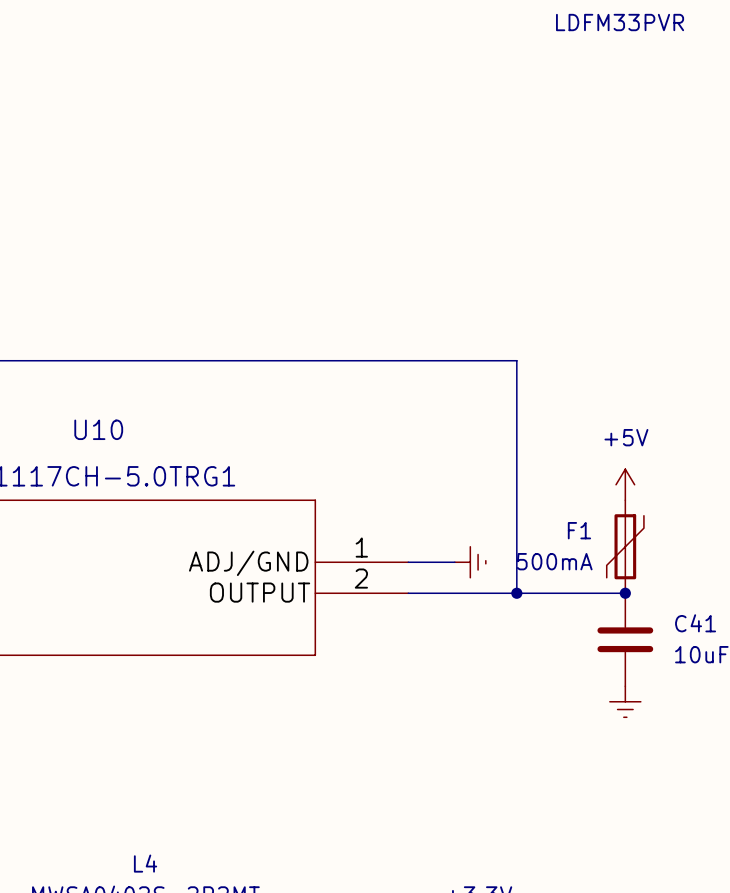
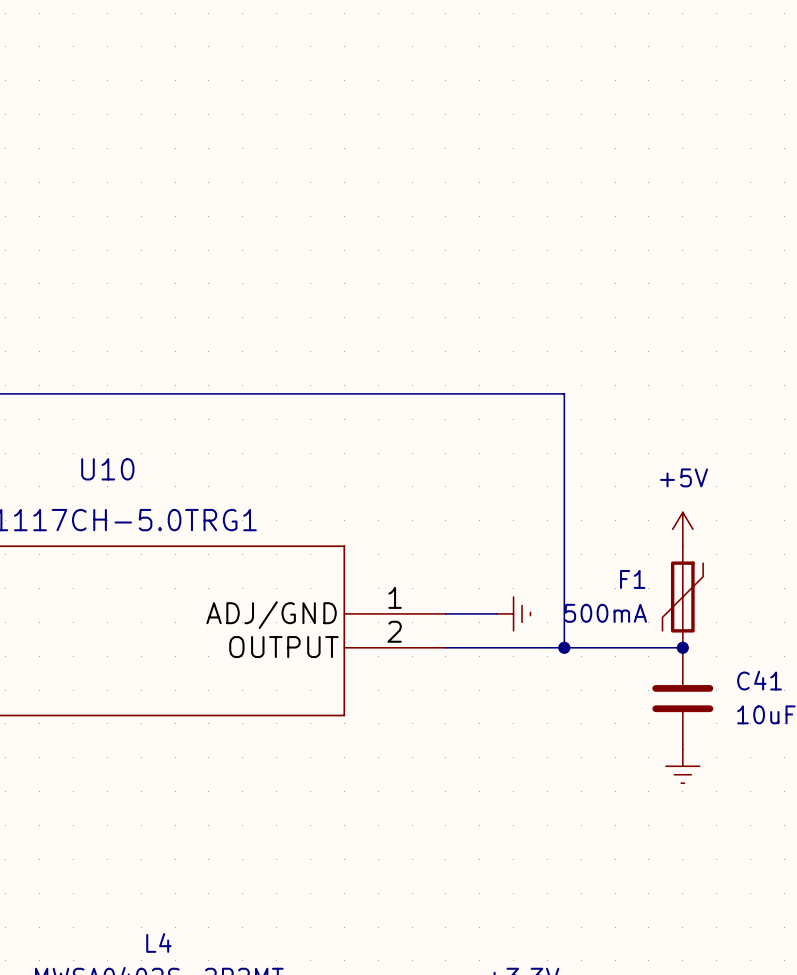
text: LDFM33PVR (620, 22) -> none

